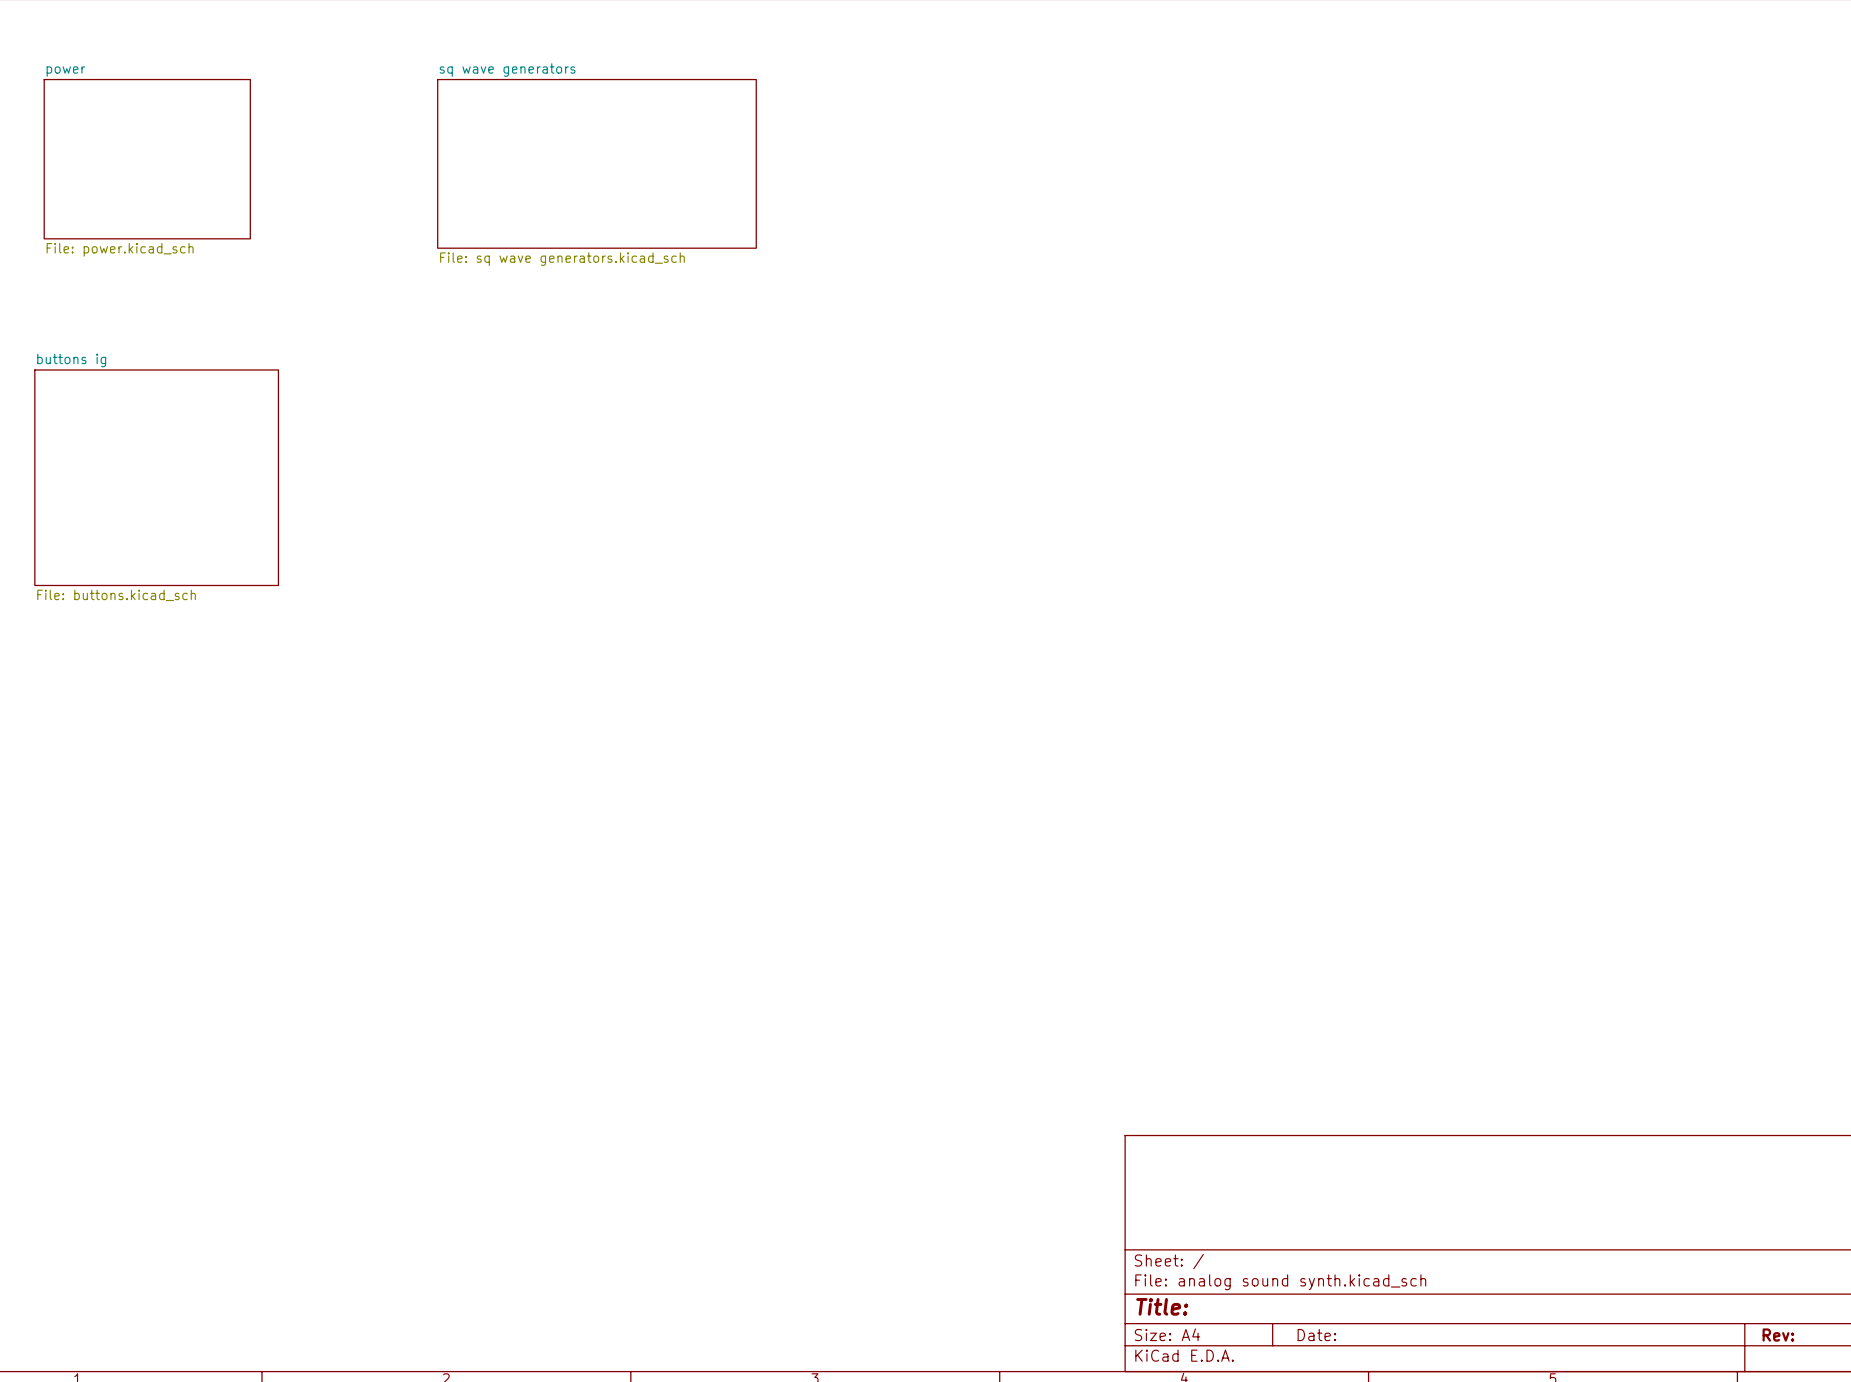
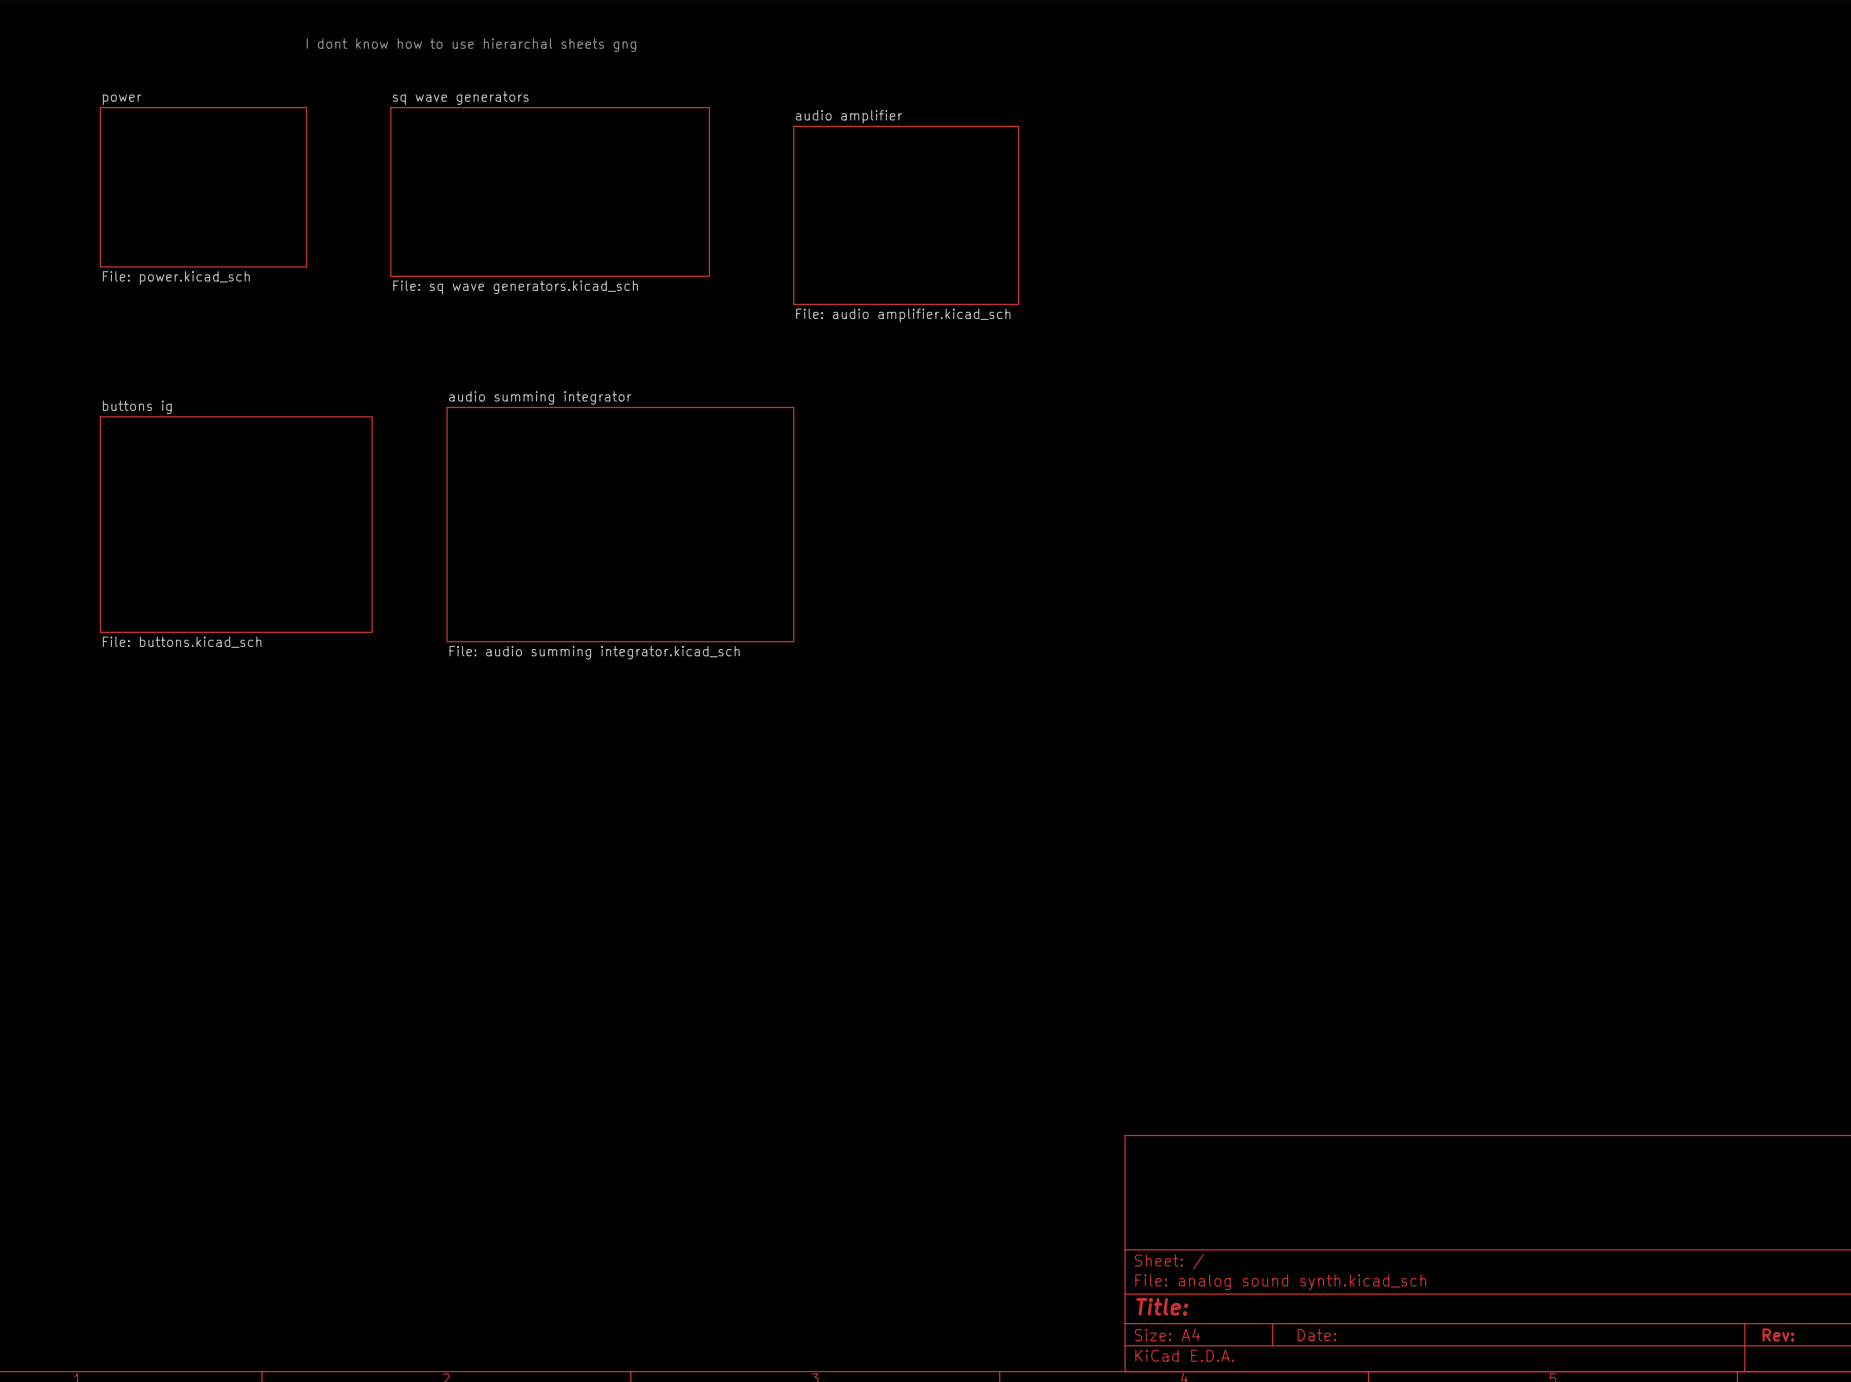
text: none -> I dont know how to use hierarchal sheets gng (471, 45)
sheet power position: (147, 159) -> (203, 187)
sheet sq wave generators position: (596, 163) -> (550, 191)
sheet audio amplifier: none -> File: audio amplifier.kicad_sch (906, 215)
sheet buttons ig: File: buttons.kicad_sch (156, 477) -> none
sheet buttons ig: none -> File: buttons.kicad_sch (236, 524)
sheet audio summing integrator: none -> File: audio summing integrator.kicad_sch (620, 524)

